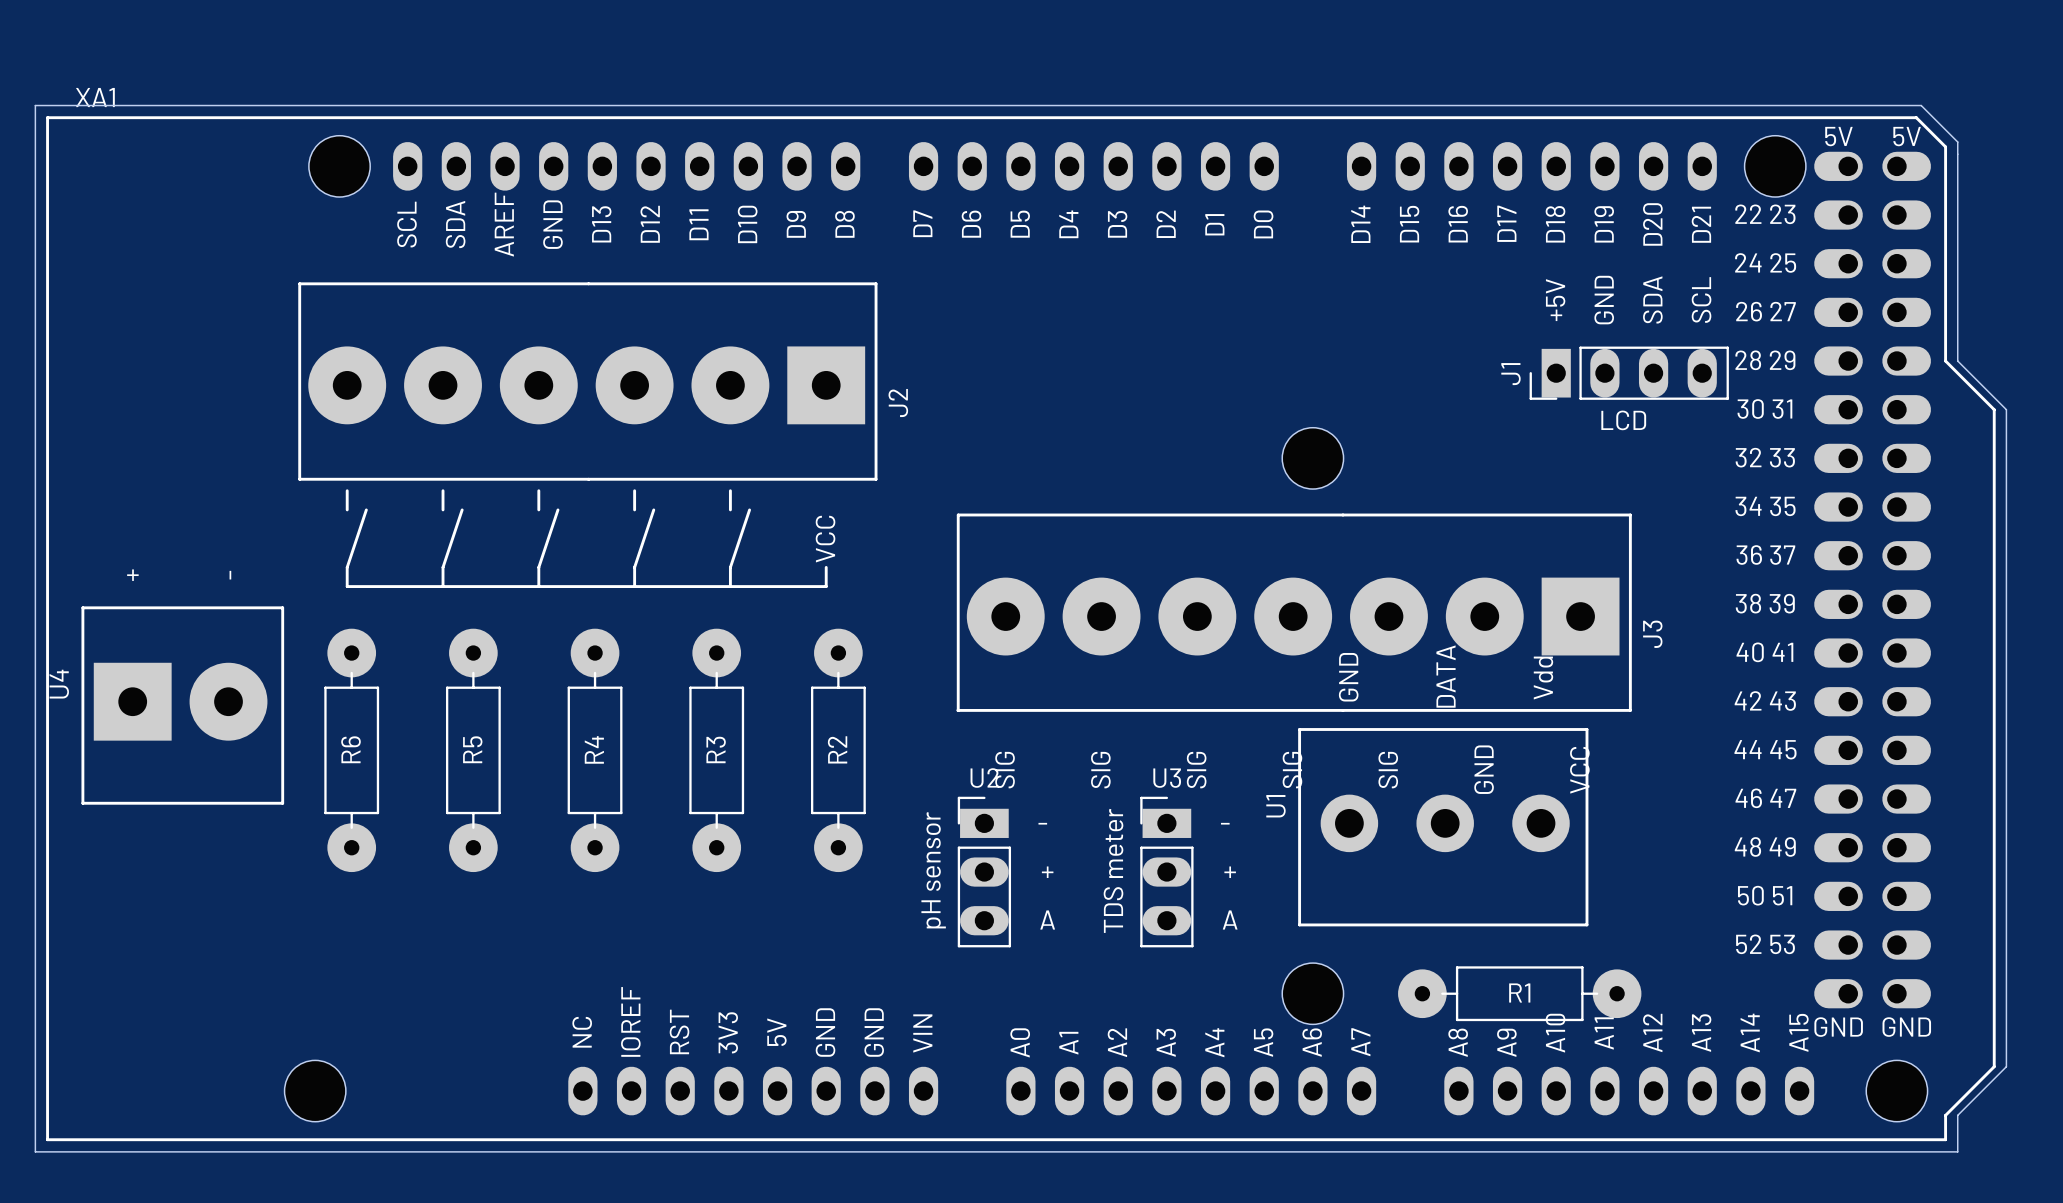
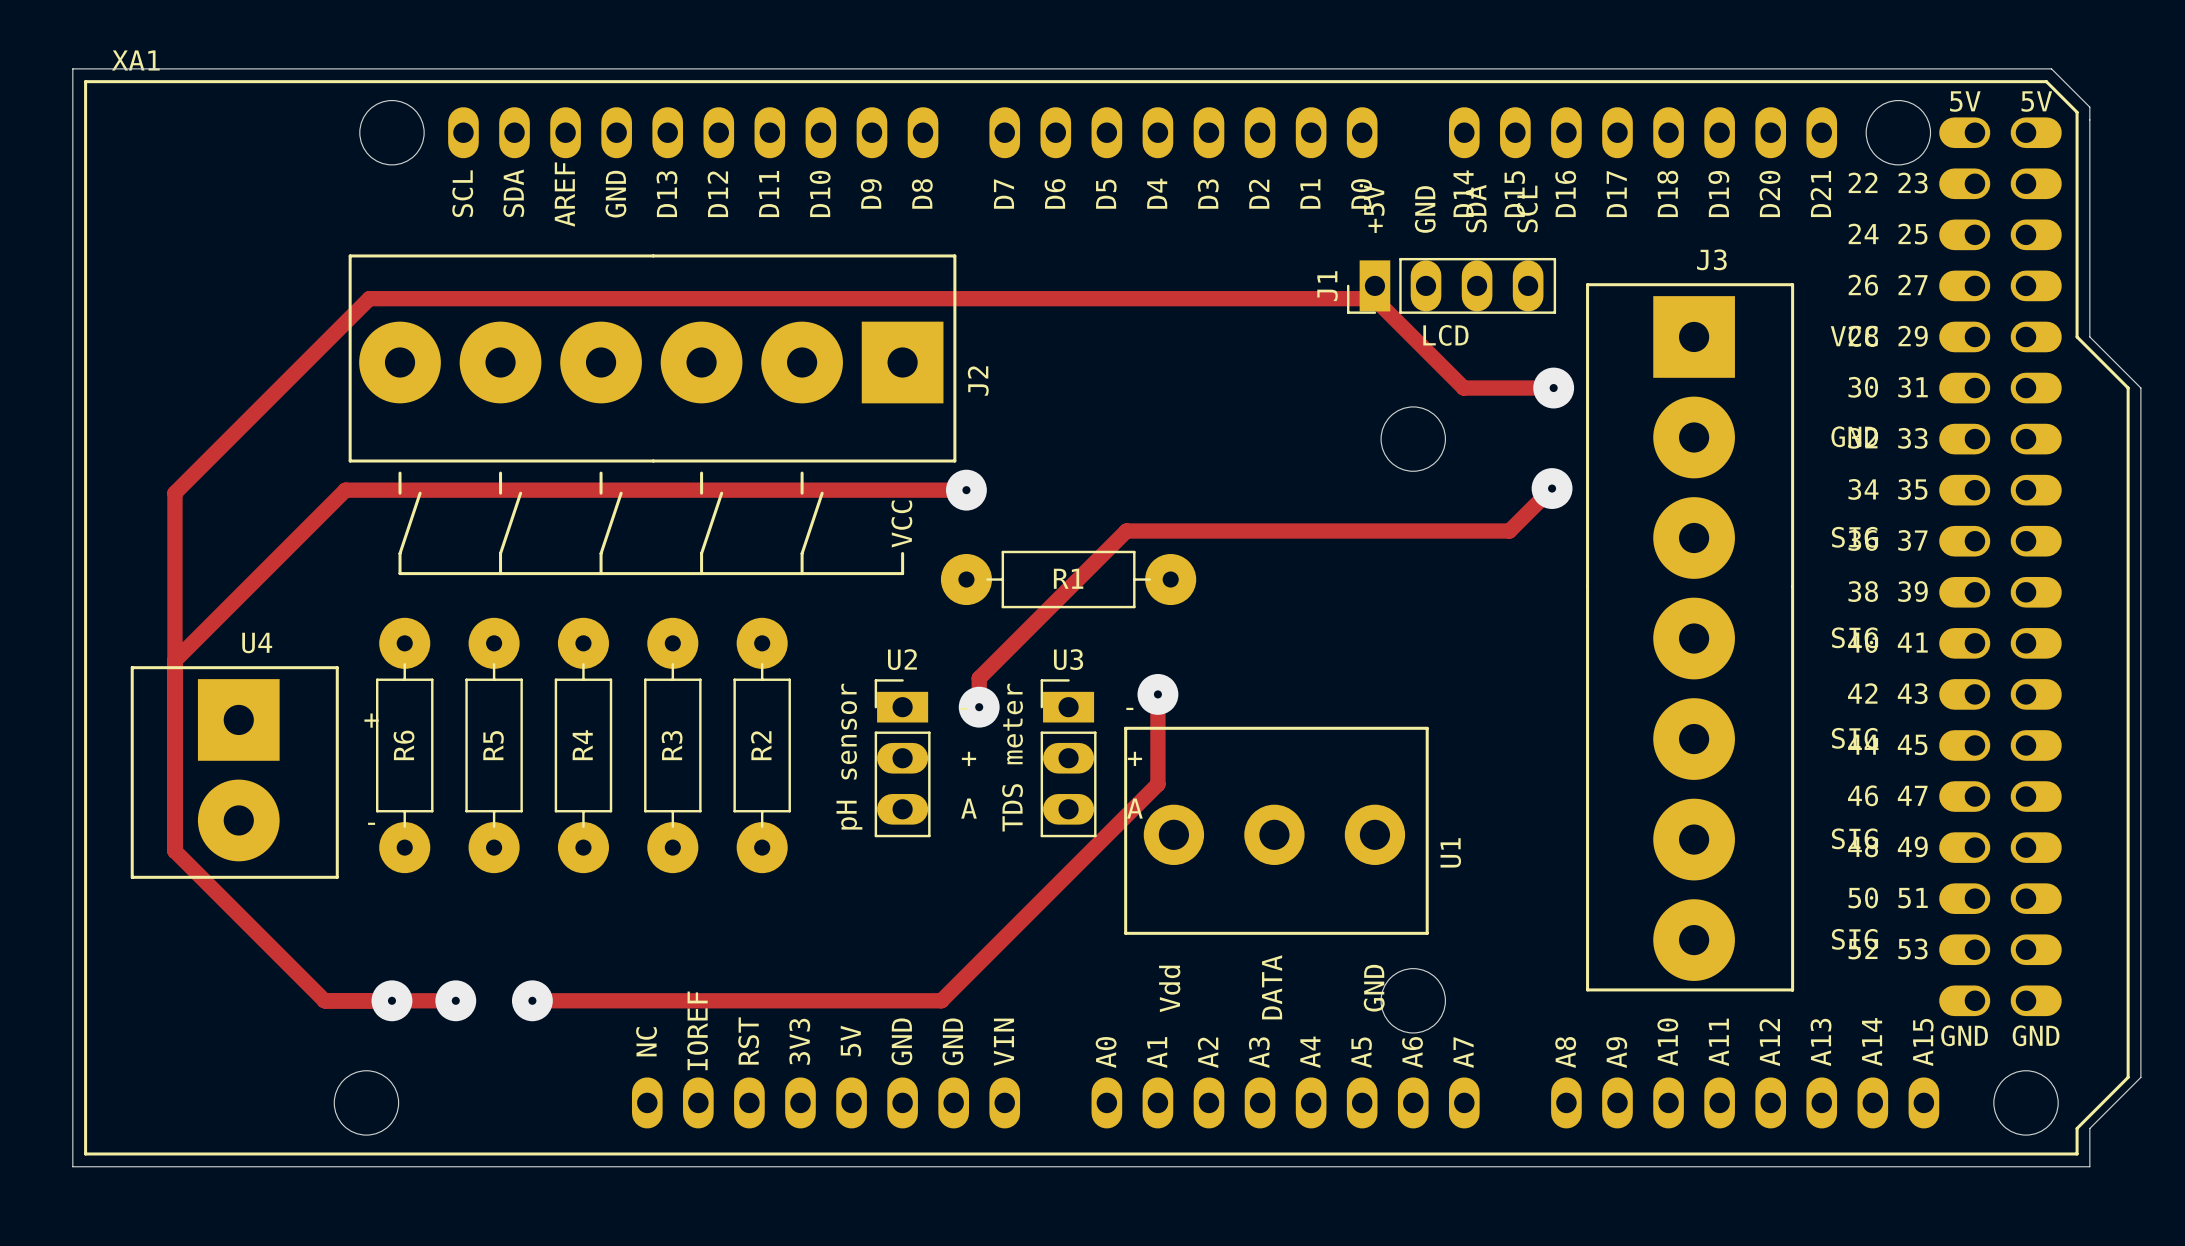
J1 position: (1629, 373) -> (1451, 285)
track: none -> (1553, 388) (1463, 388) (1374, 298) (369, 298) (174, 493) (174, 851) (324, 1000) (455, 1000)
via: none -> (1553, 388)
track: none -> (1552, 488) (1509, 531) (1126, 531) (979, 678) (979, 707)
via: none -> (1552, 488)
track: none -> (966, 490) (345, 490) (174, 660)
via: none -> (966, 490)
J3 rotation: 0° (1294, 612) -> 90° counterclockwise (1690, 637)
track: none -> (1157, 694) (1157, 784) (941, 1000) (532, 1000)
via: none -> (1157, 694)
U4 rotation: 0° (182, 705) -> 90° clockwise (234, 772)
via: none -> (979, 707)
R5 position: (473, 750) -> (494, 745)
R4 position: (595, 750) -> (583, 745)
R3 position: (716, 750) -> (672, 745)
R2 position: (838, 750) -> (762, 745)
U1 rotation: 0° (1443, 827) -> 180° (1276, 830)
U1 position: (1443, 827) -> (1276, 830)
U2 position: (984, 872) -> (902, 758)
U3 position: (1166, 872) -> (1068, 758)
via: none -> (391, 1000)
via: none -> (455, 1000)
via: none -> (532, 1000)
R1 position: (1519, 993) -> (1068, 579)

